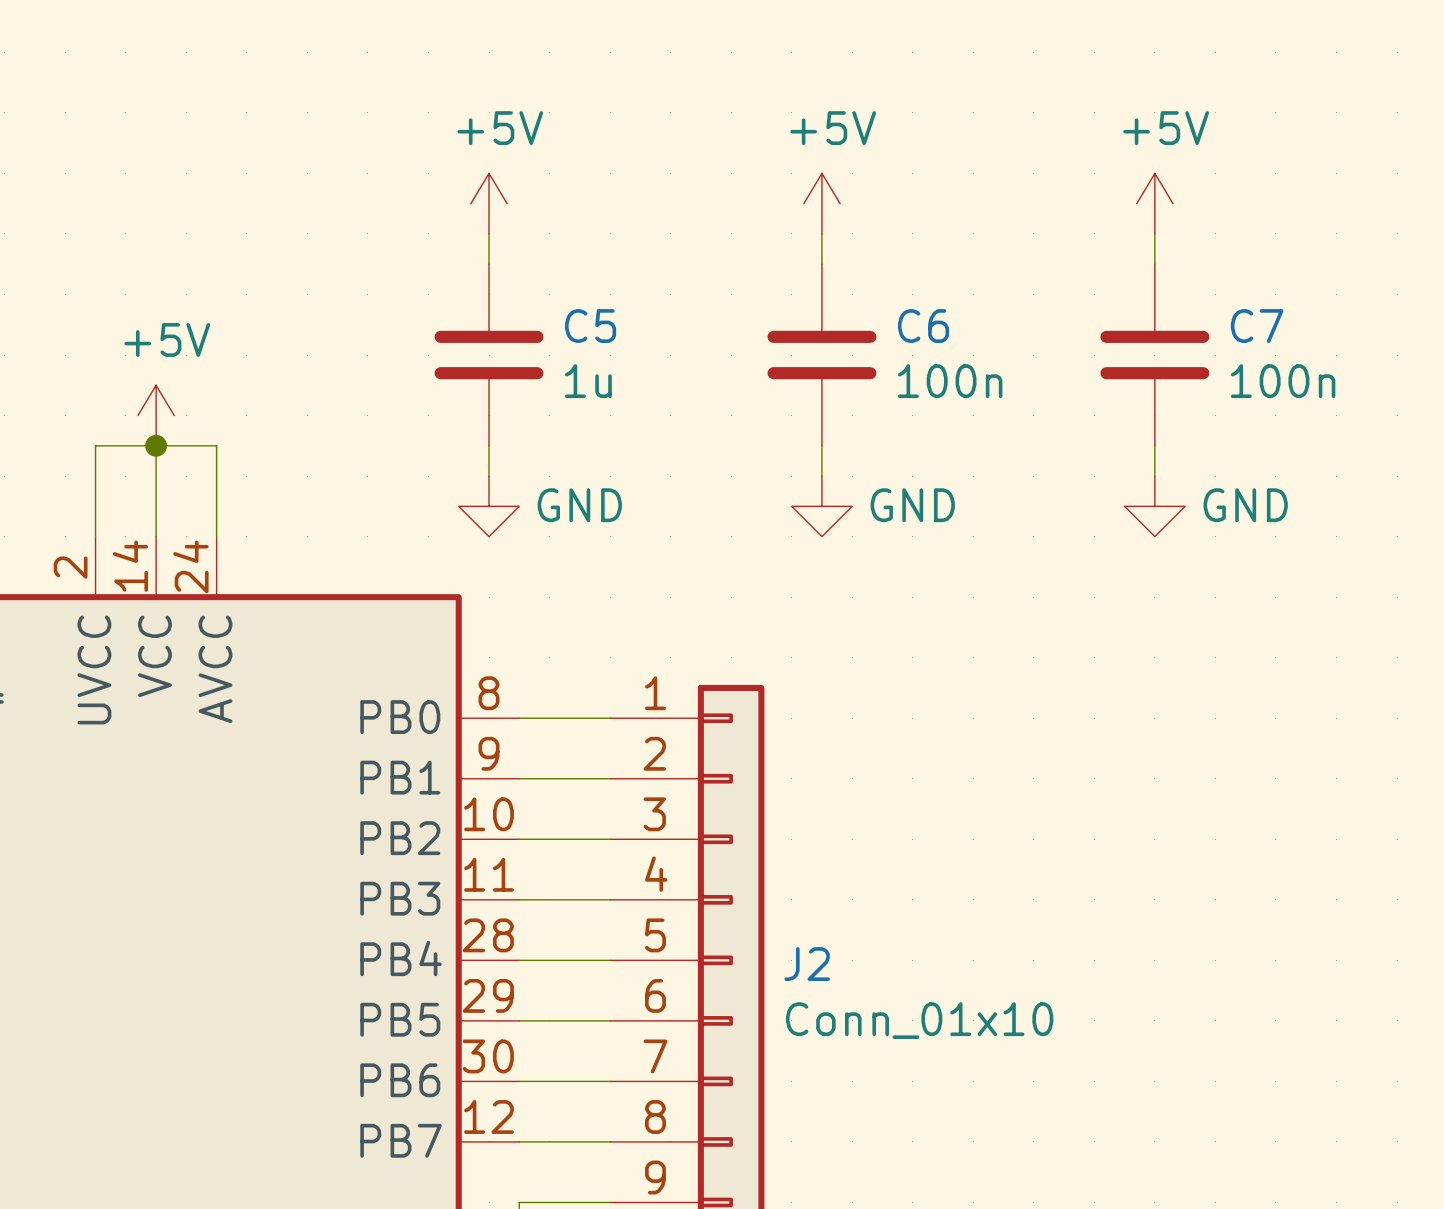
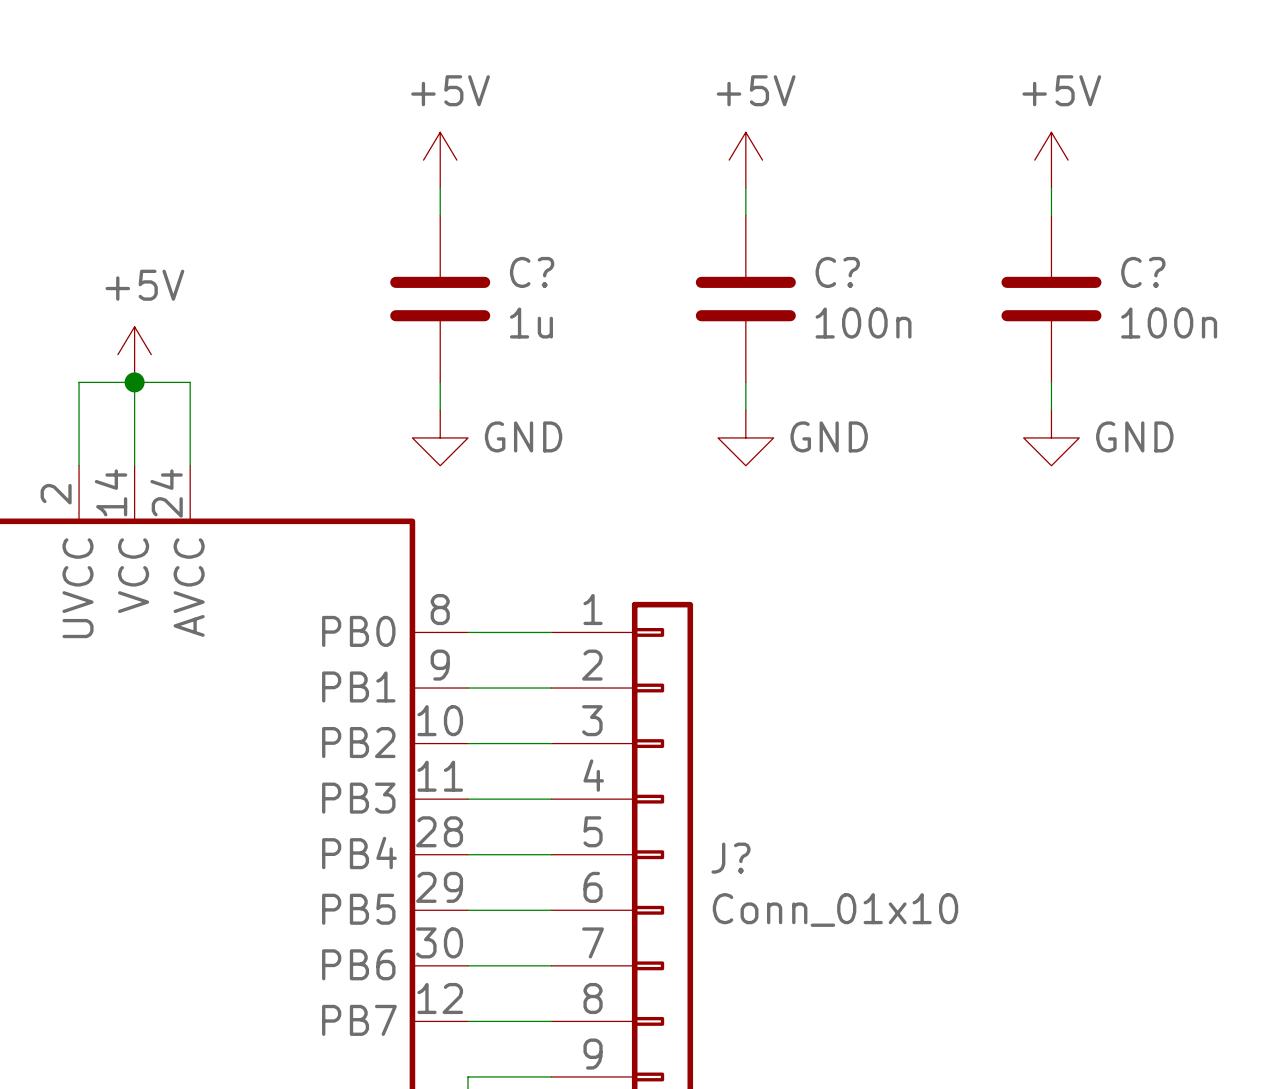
C5 name: C5 (590, 326) -> C? (532, 272)
C6 name: C6 (923, 326) -> C? (837, 272)
C7 name: C7 (1257, 326) -> C? (1143, 272)
J2 name: J2 (807, 964) -> J? (730, 858)

